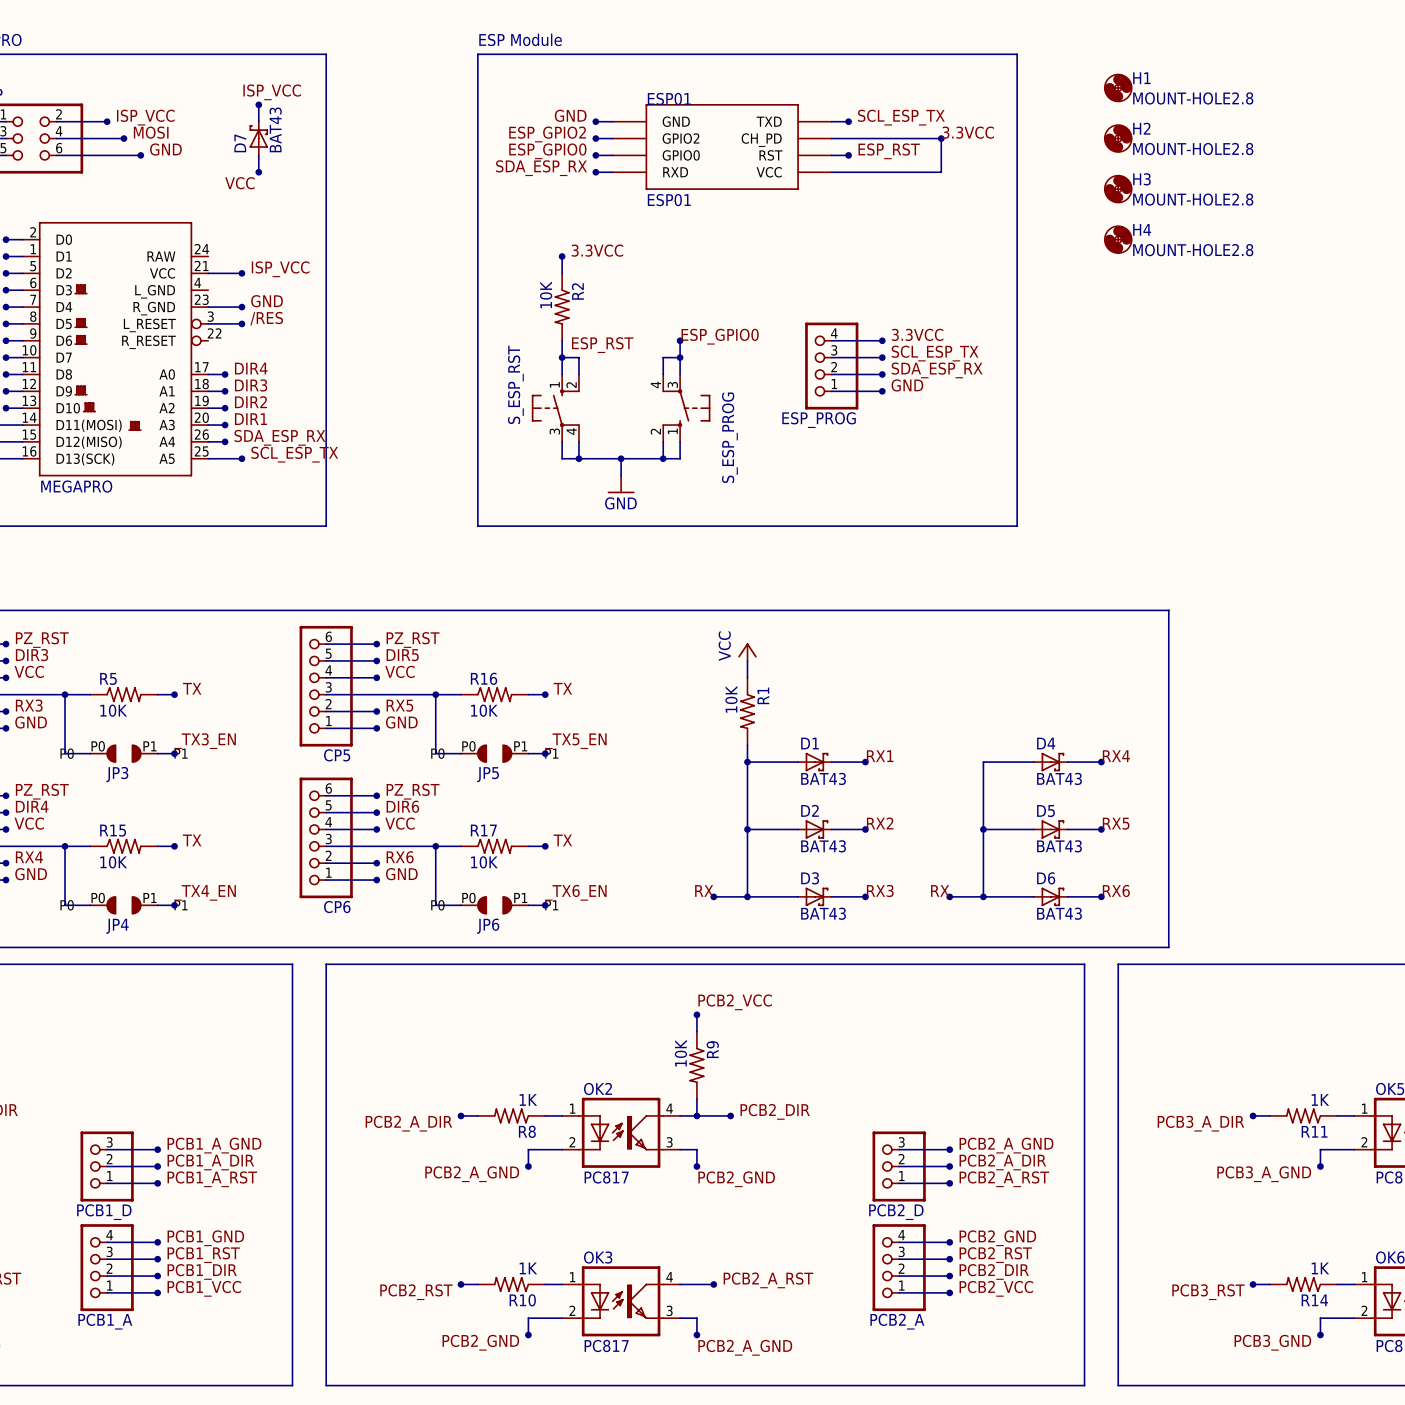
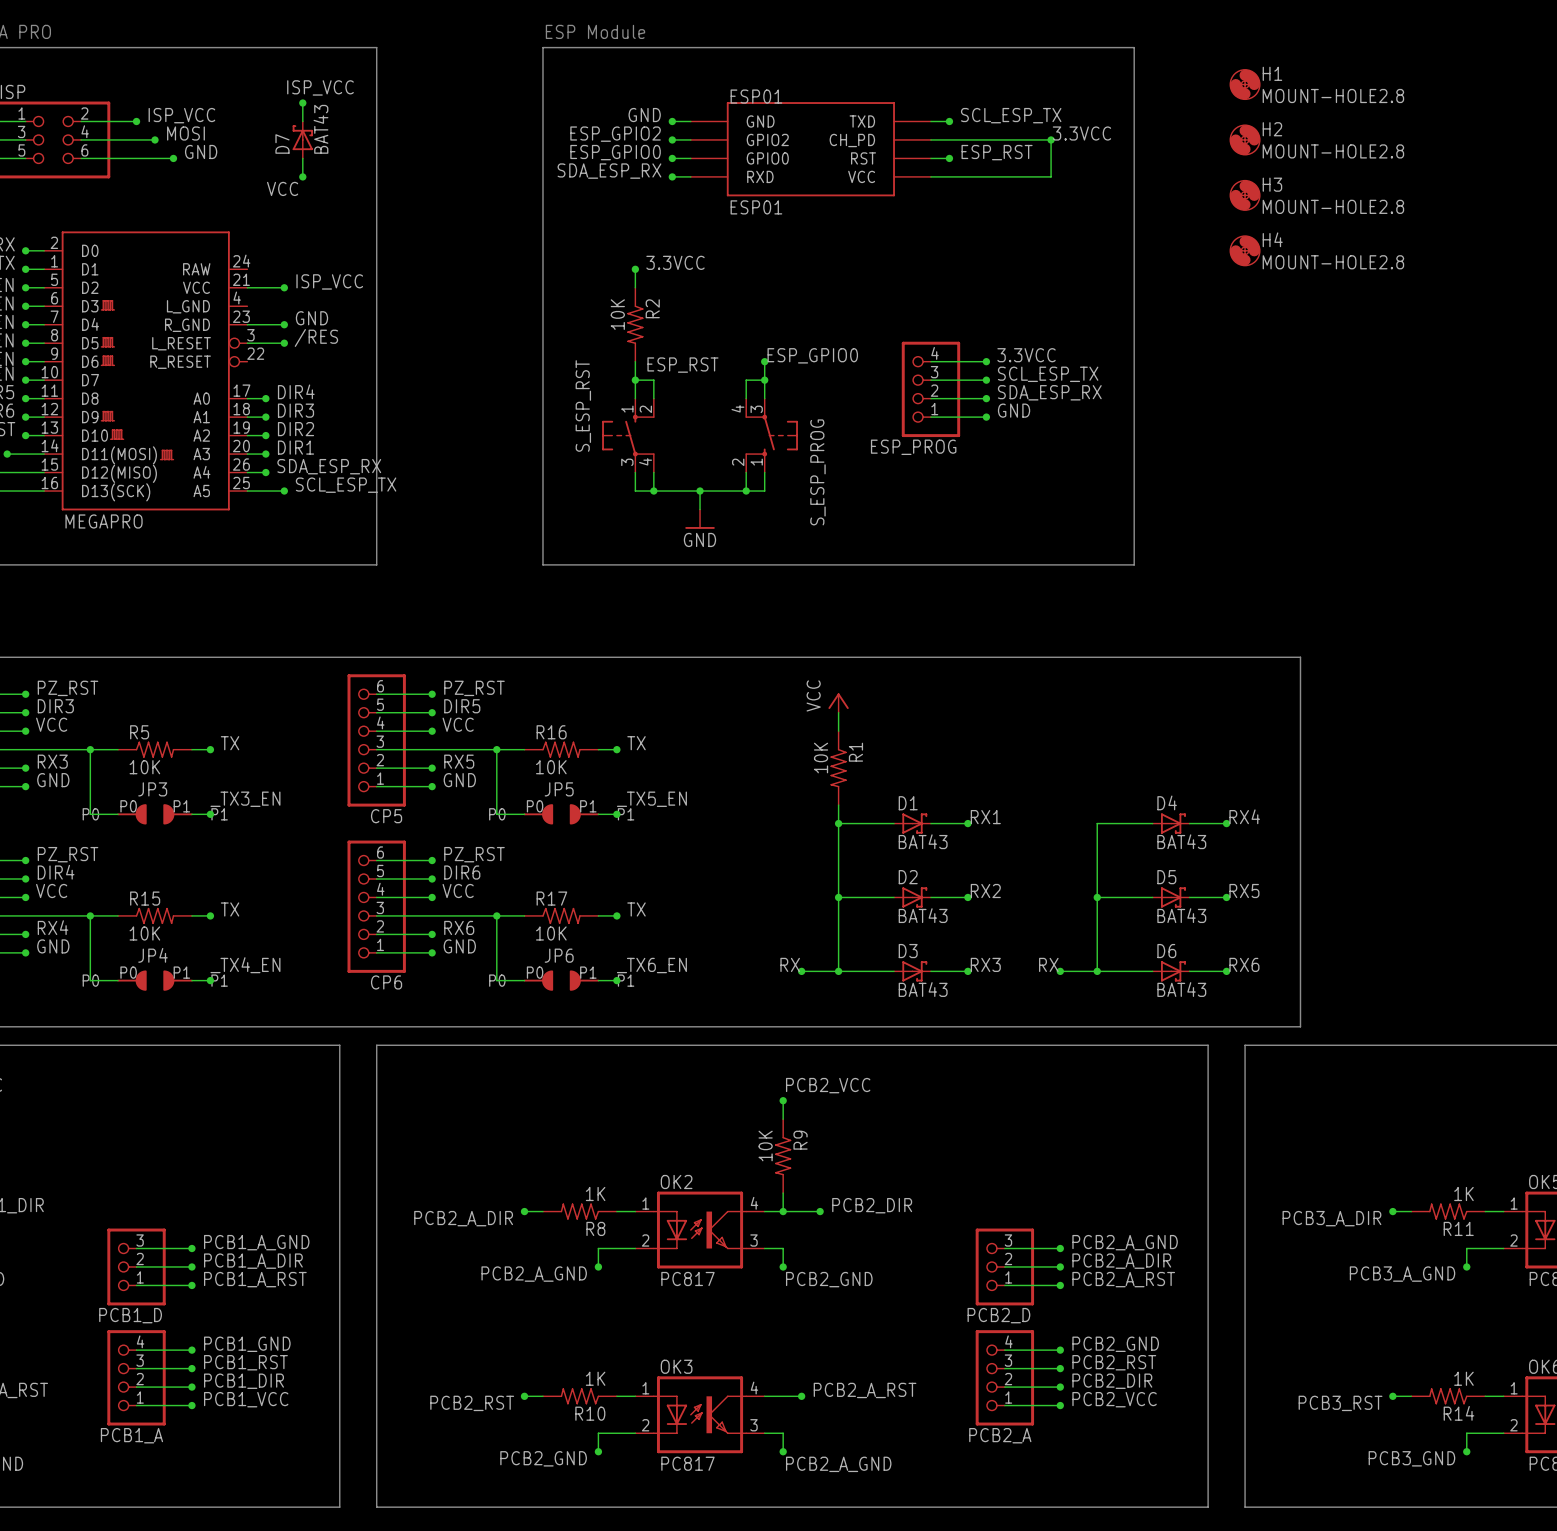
JP3 name position: JP3 (117, 774) -> JP3 (152, 789)
JP5 name position: JP5 (488, 774) -> JP5 (559, 789)
JP4 name position: JP4 (117, 926) -> JP4 (153, 955)
JP6 name position: JP6 (488, 926) -> JP6 (559, 955)

